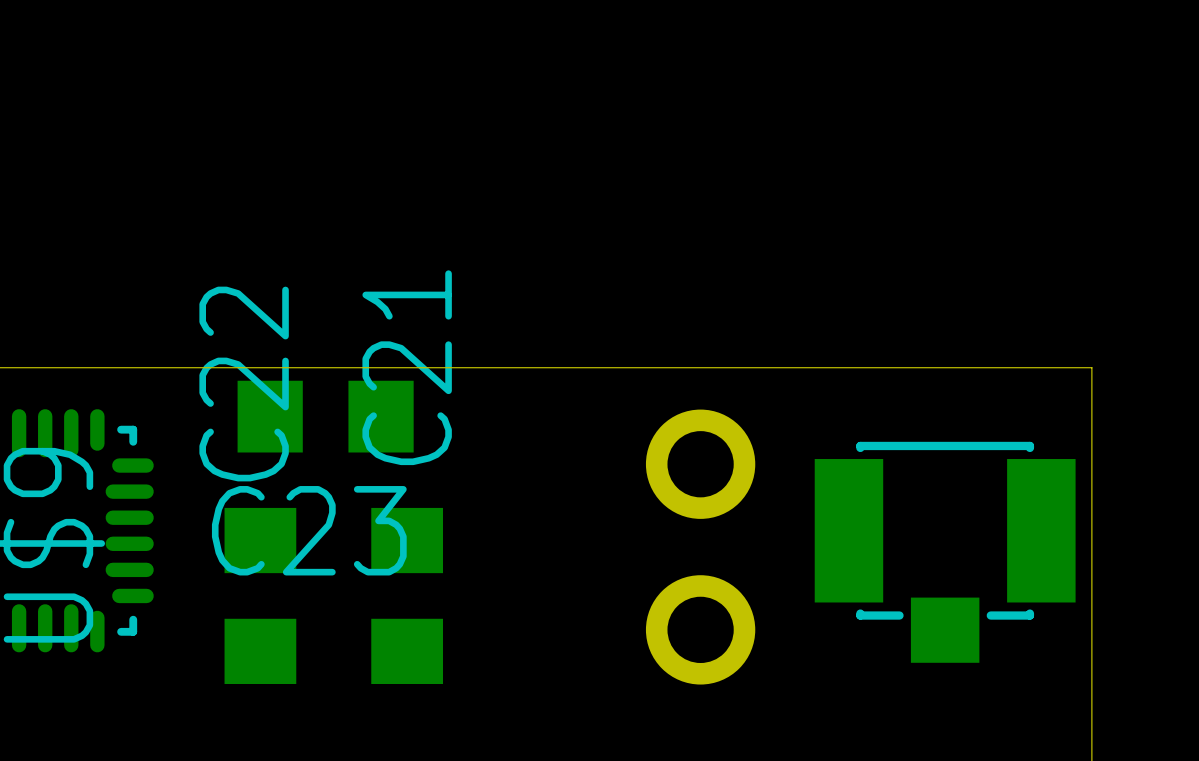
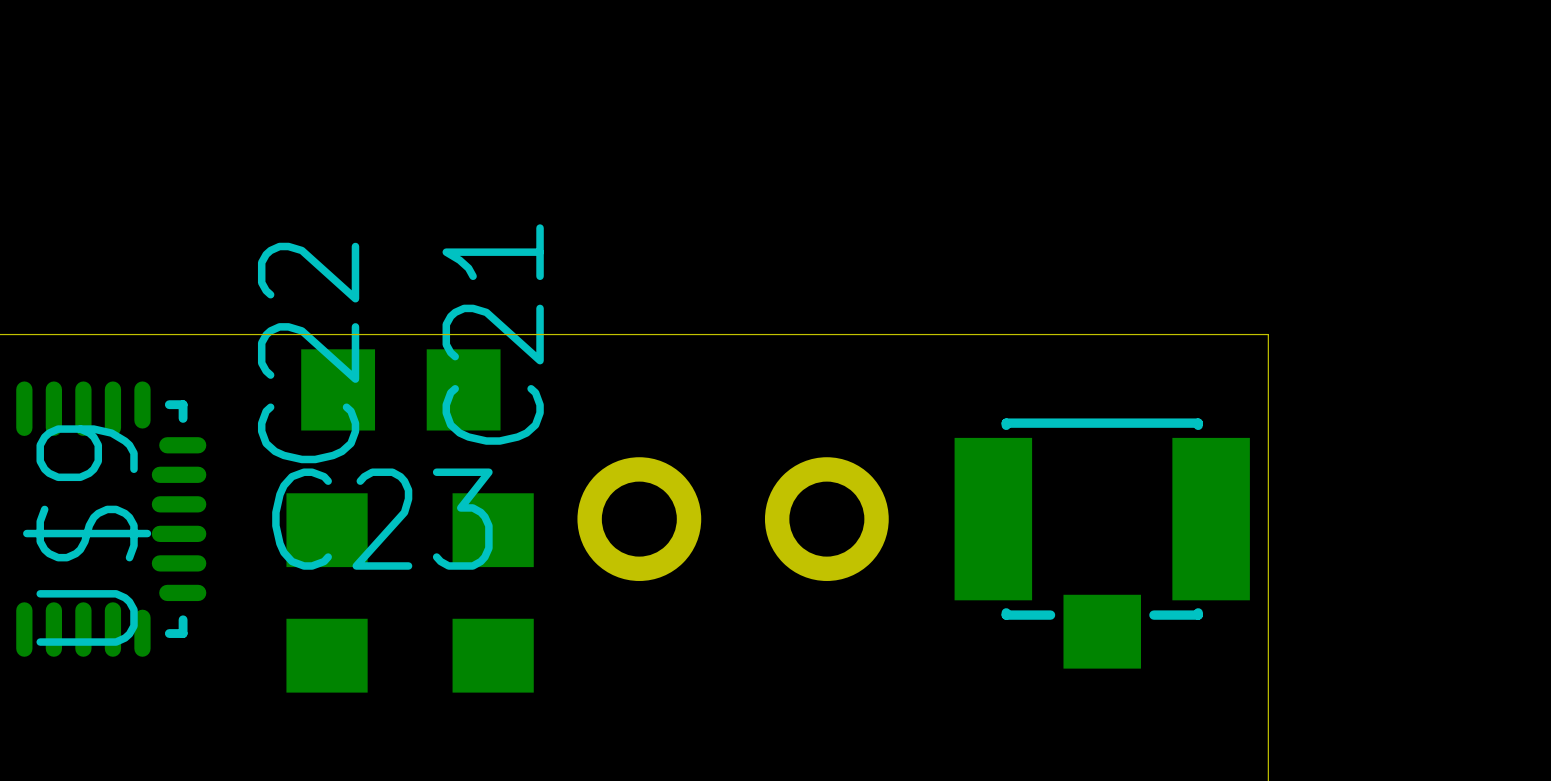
part rotation: 0° (700, 547) -> 90° clockwise (733, 519)

